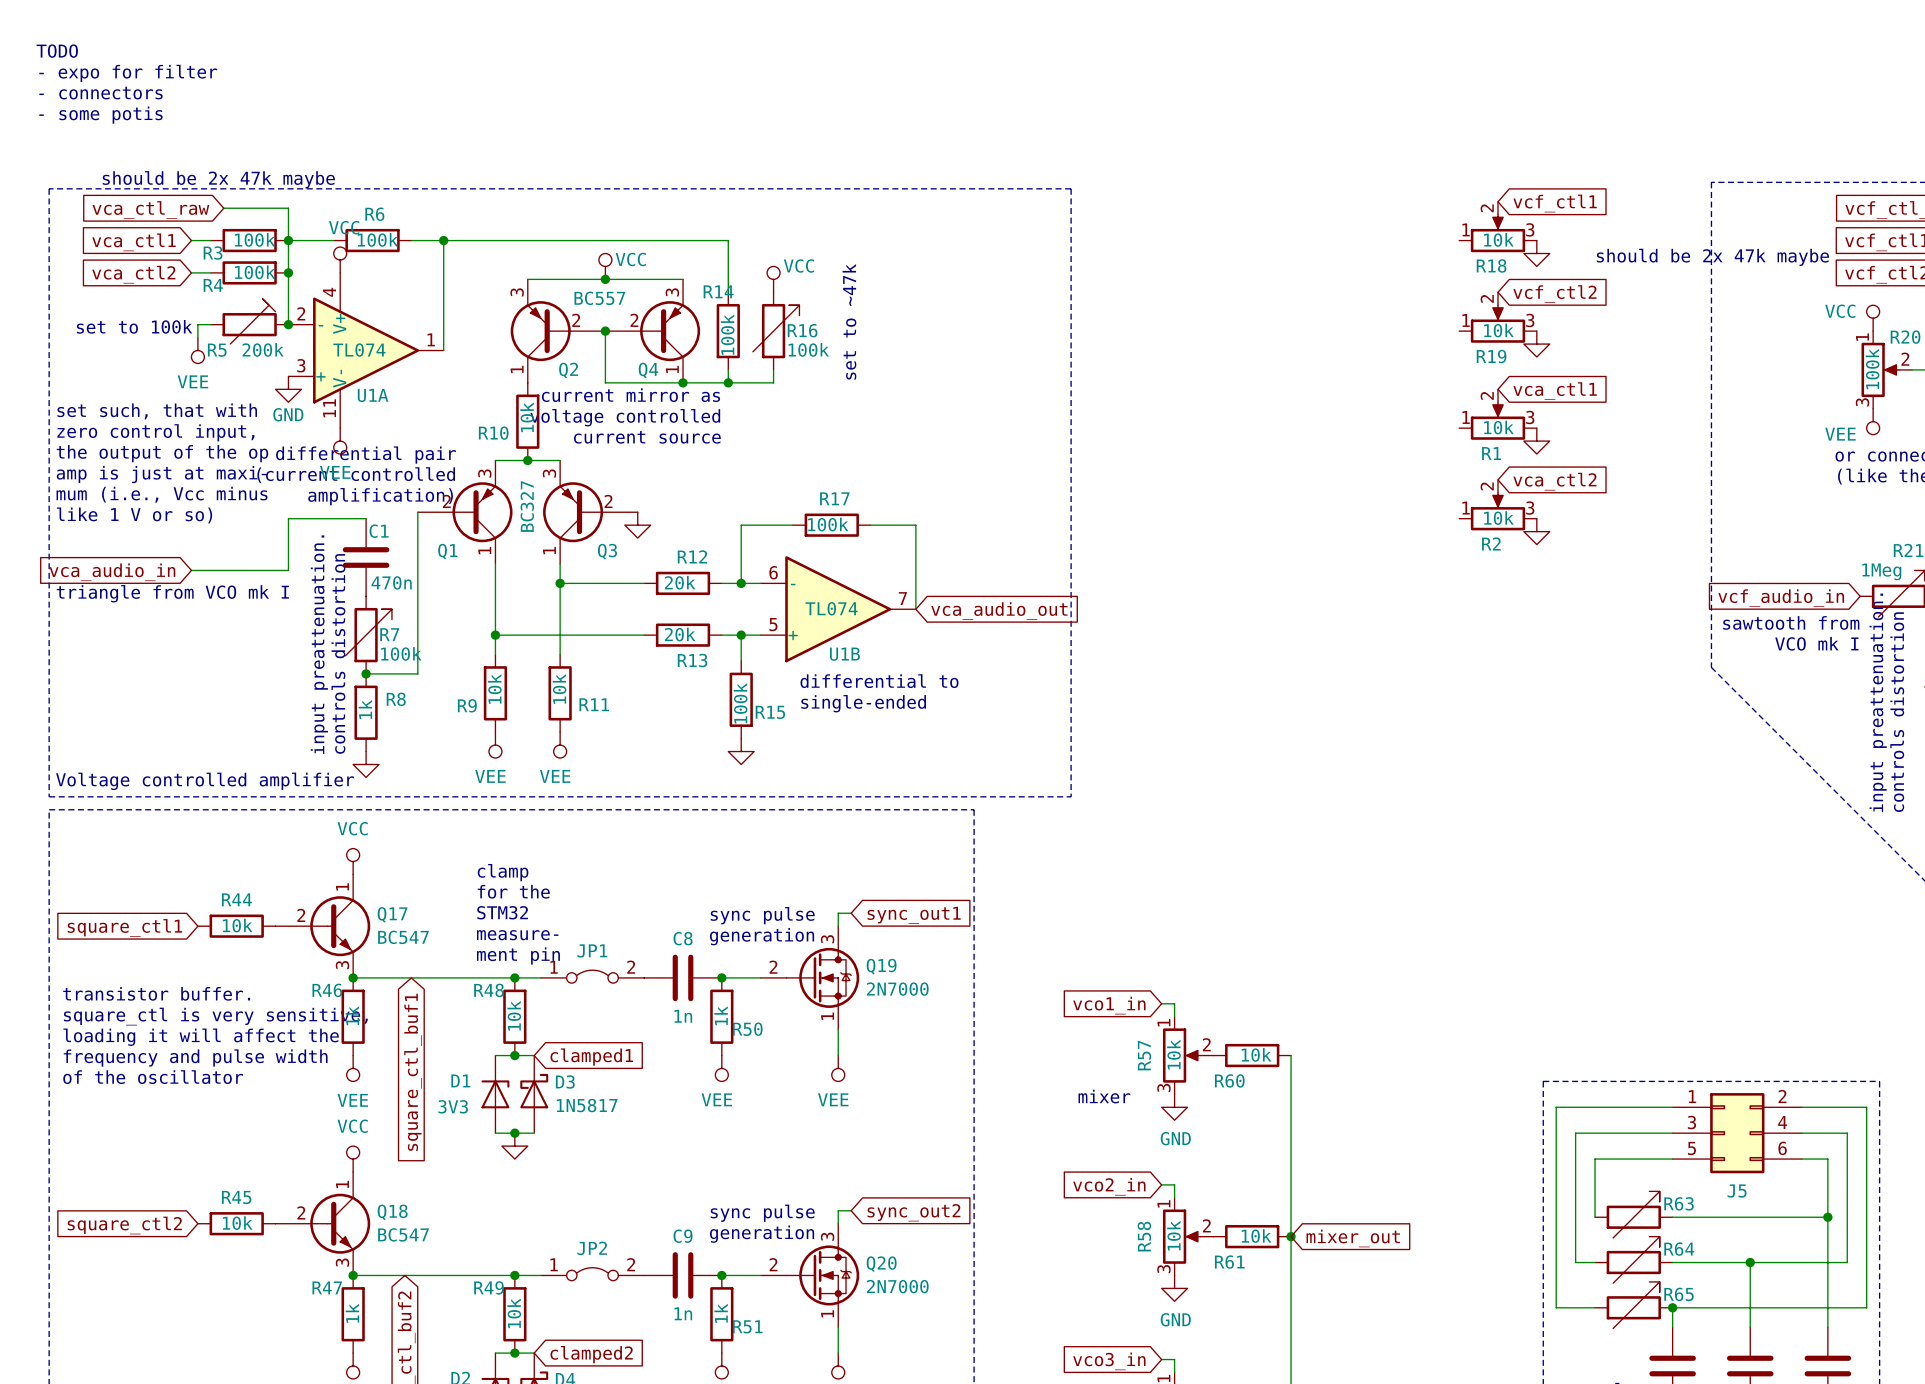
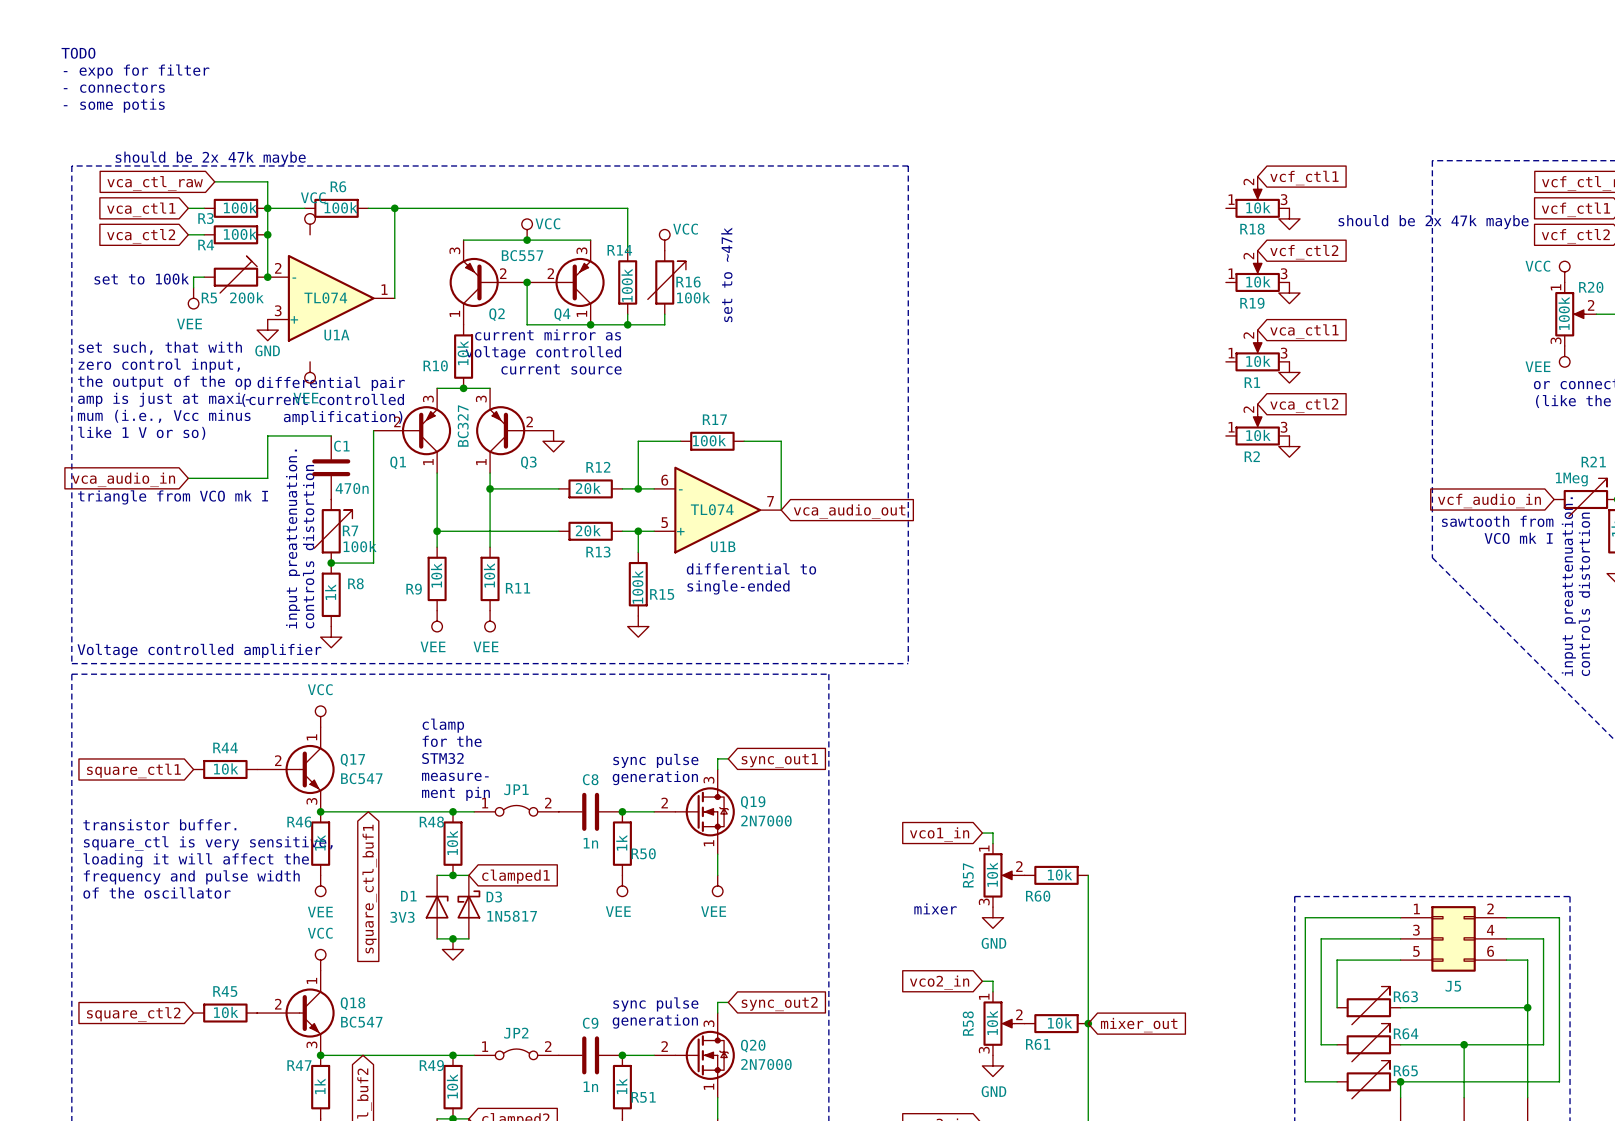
part: (340, 350) -> none

